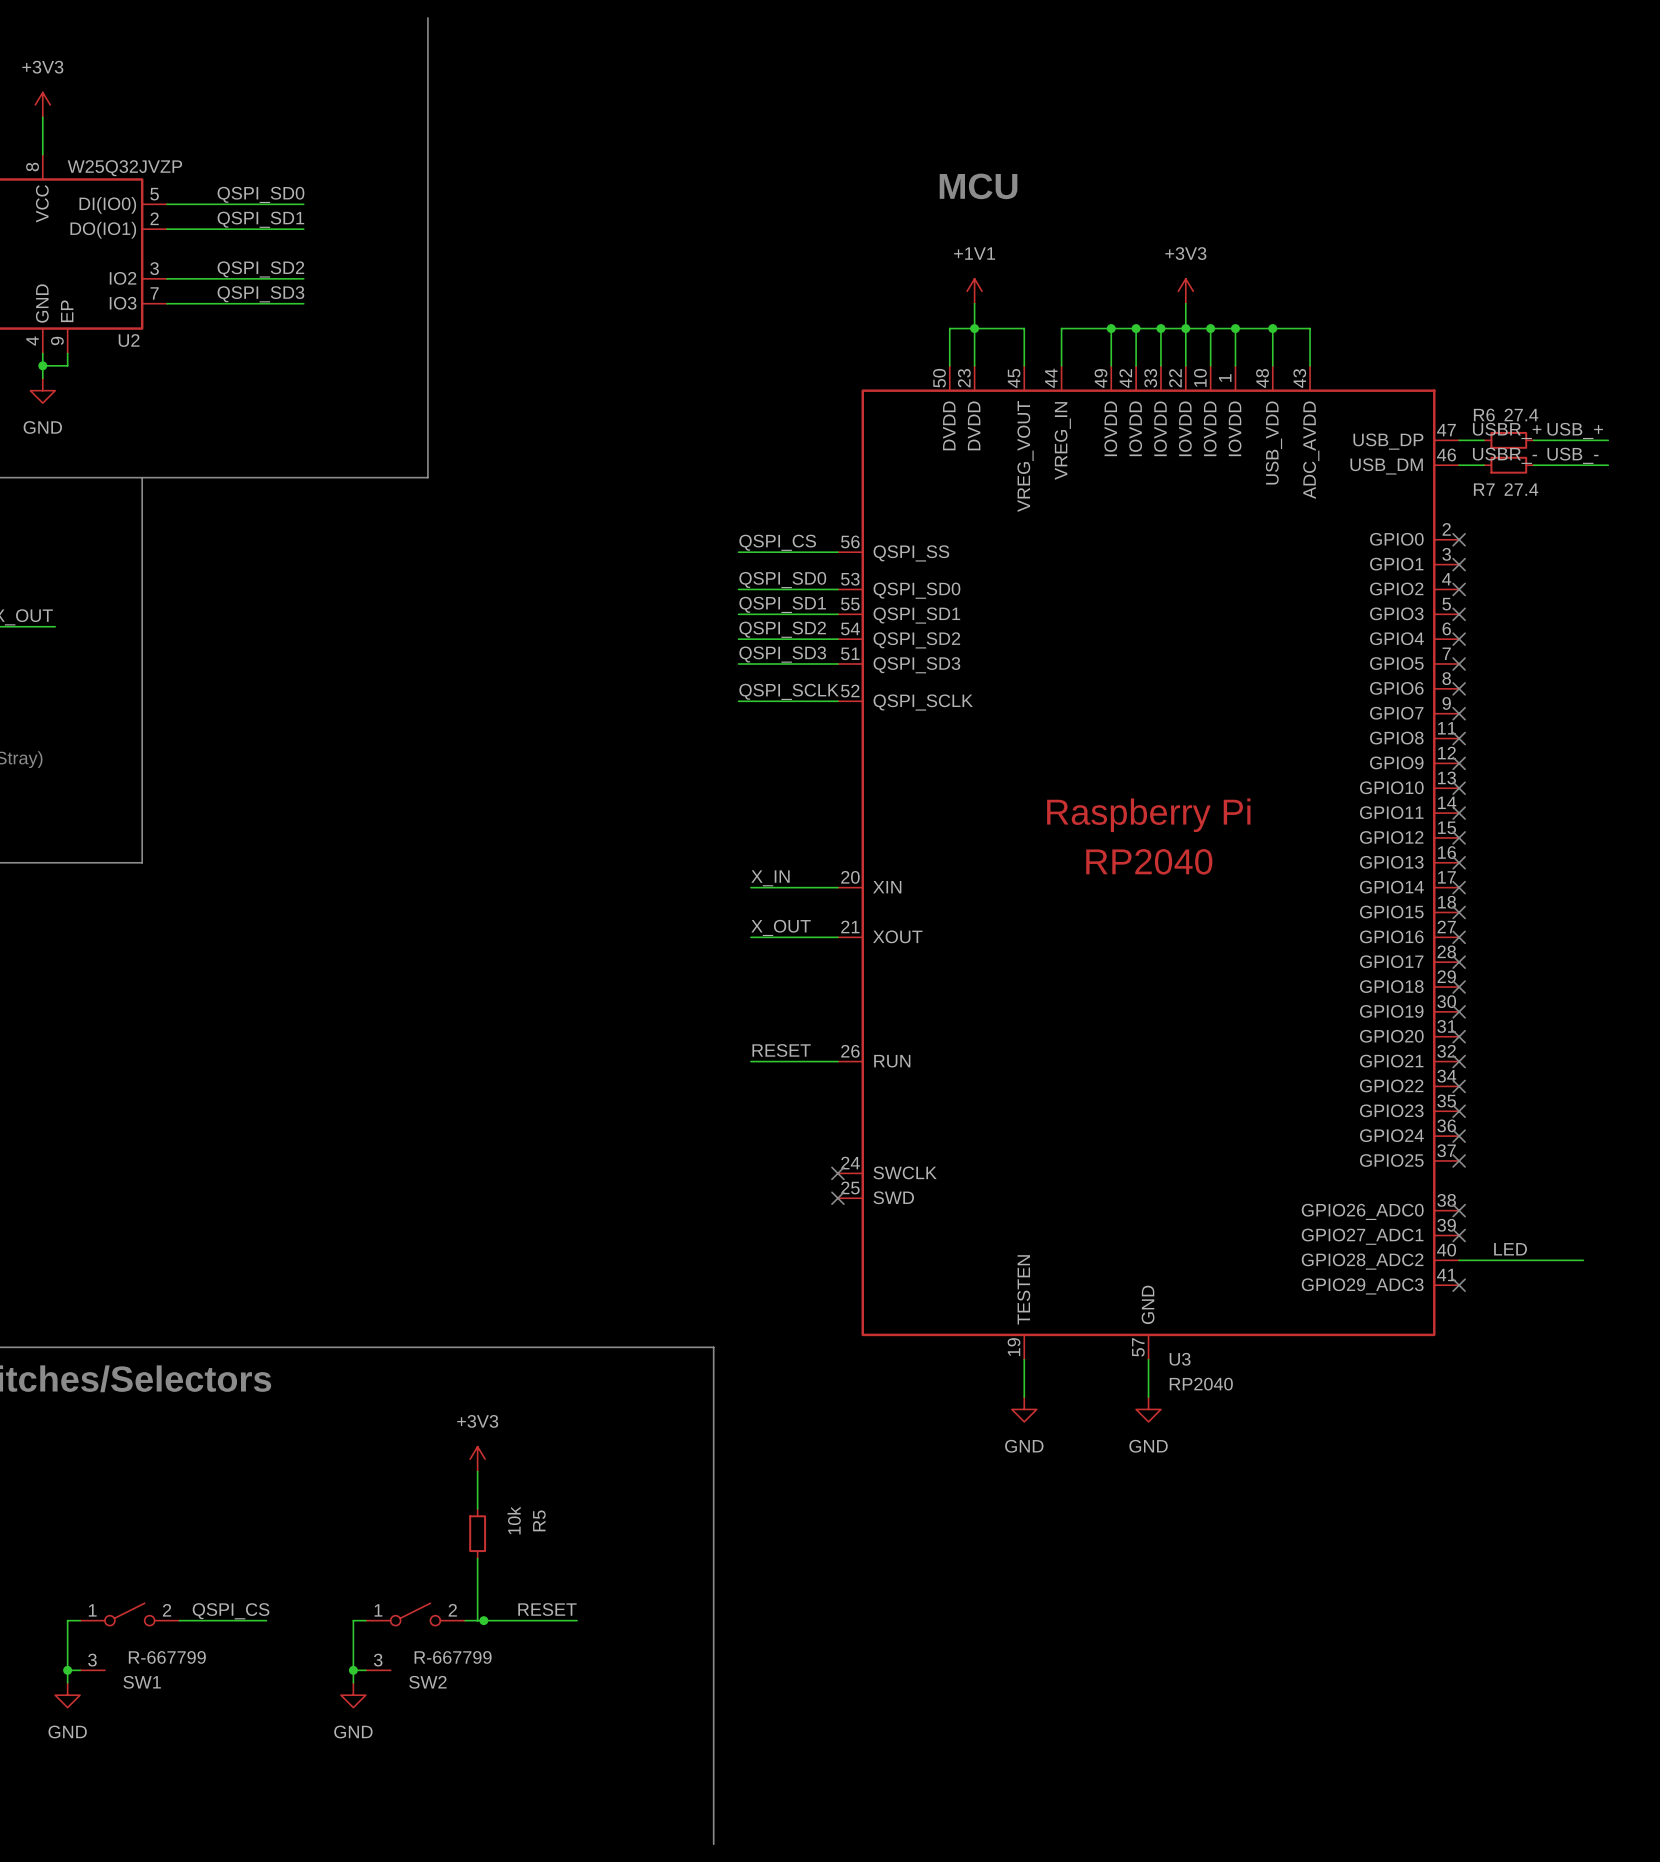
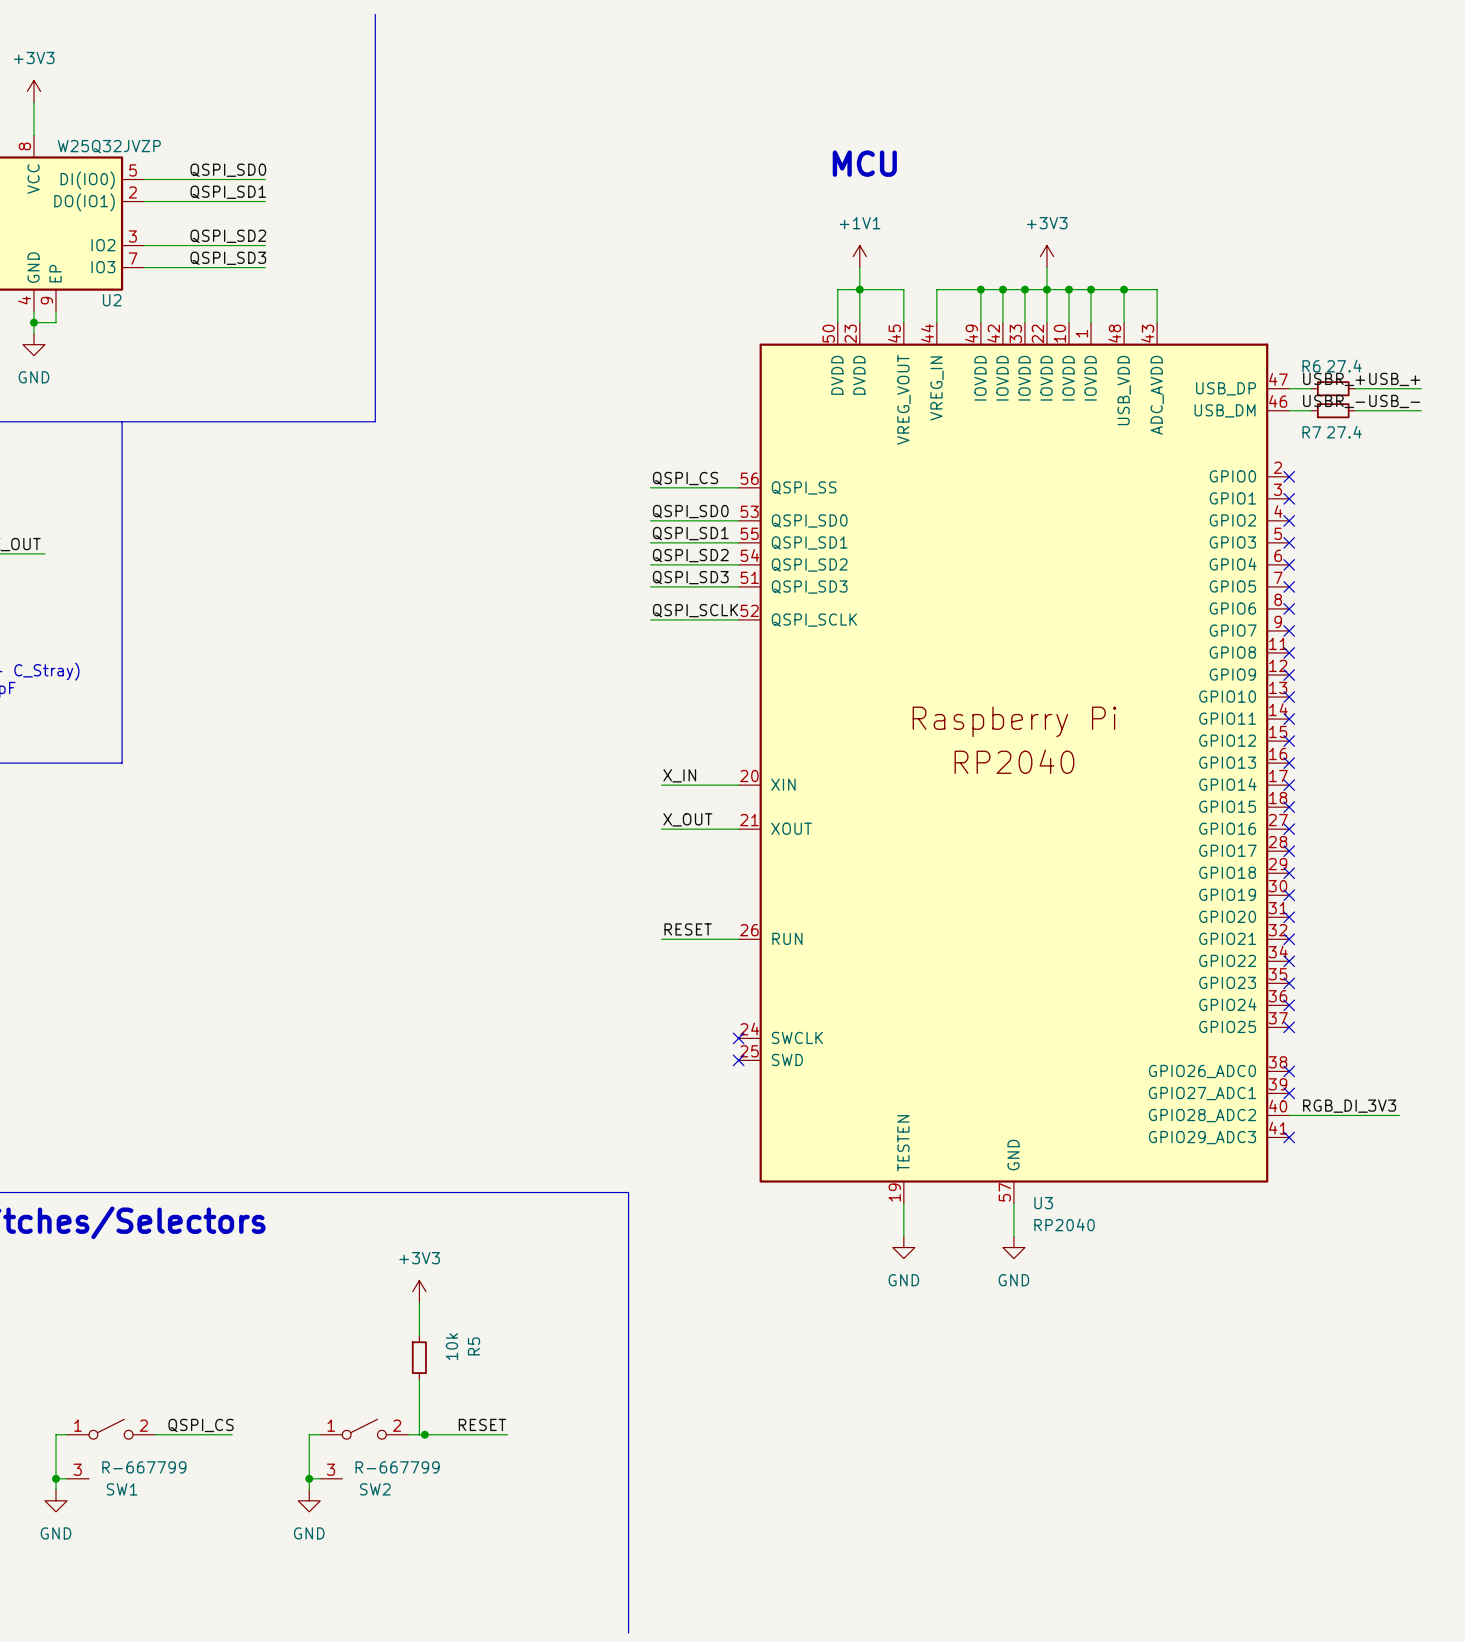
label: LED (1510, 1249) -> none
label: none -> RGB_DI_3V3 (1349, 1106)

